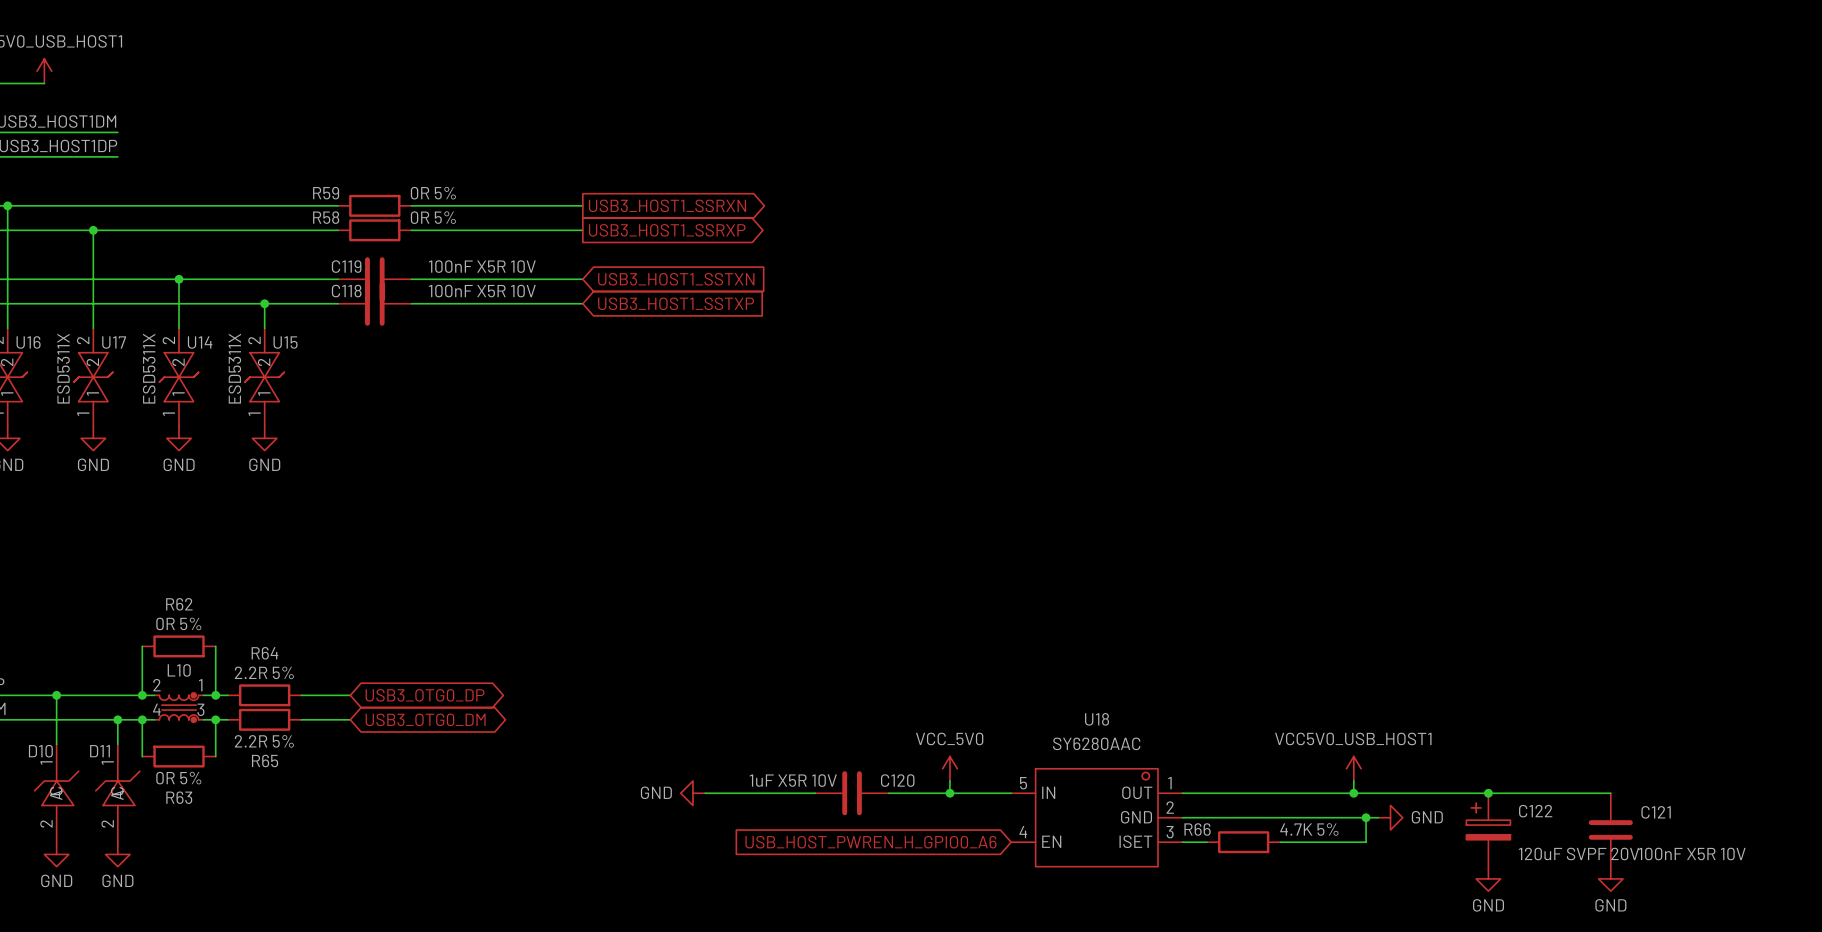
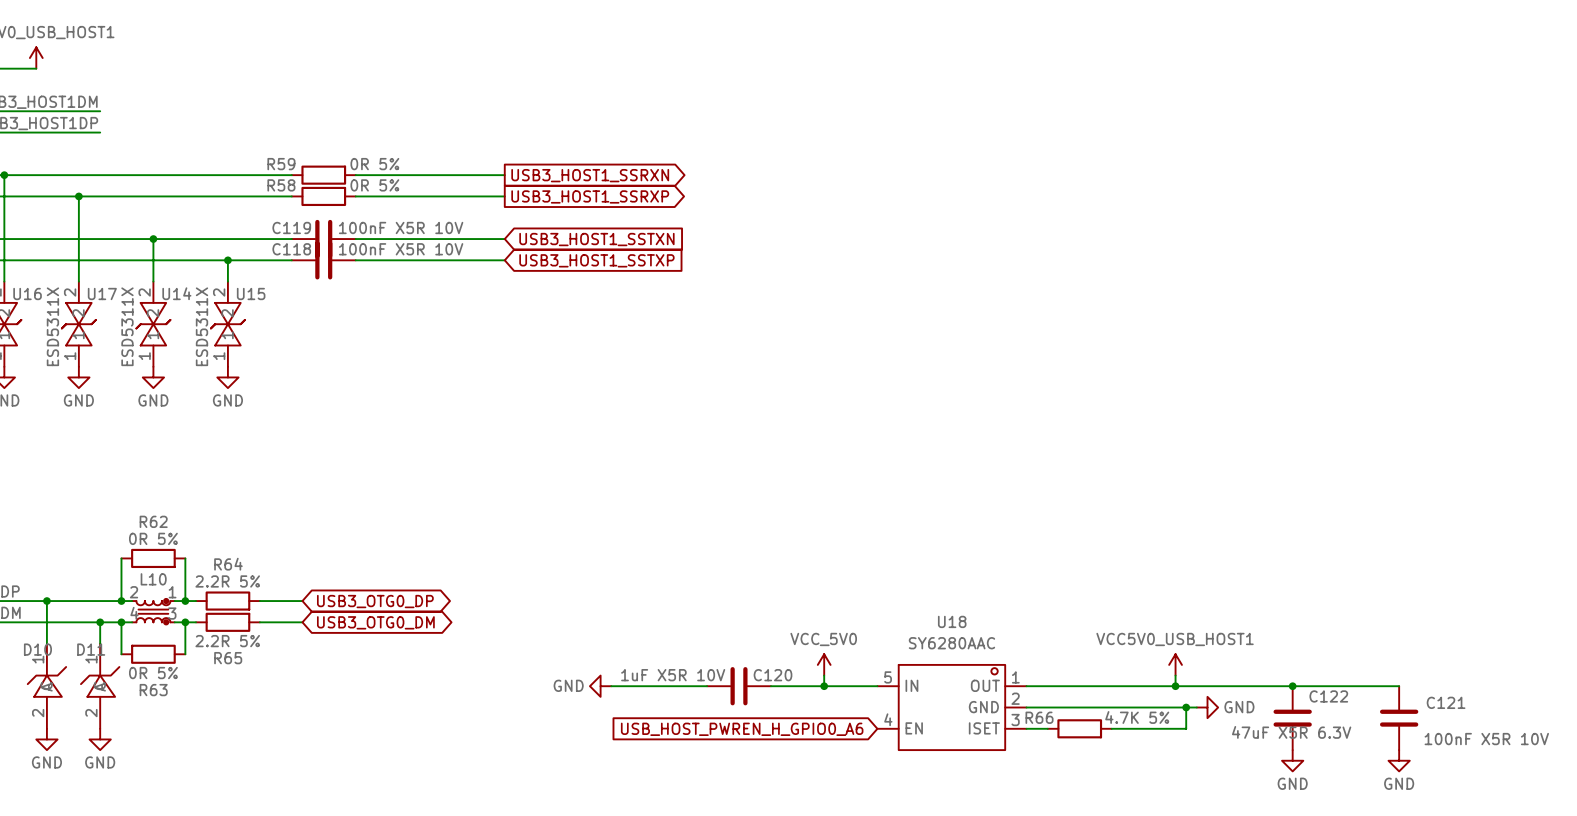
C122 symbol: [1466, 793, 1511, 867] -> [1273, 686, 1312, 751]
C122 name position: C122 (1535, 811) -> C122 (1328, 696)
C122 value: 120uF SVPF 20V (1579, 853) -> 47uF X5R 6.3V (1291, 732)

